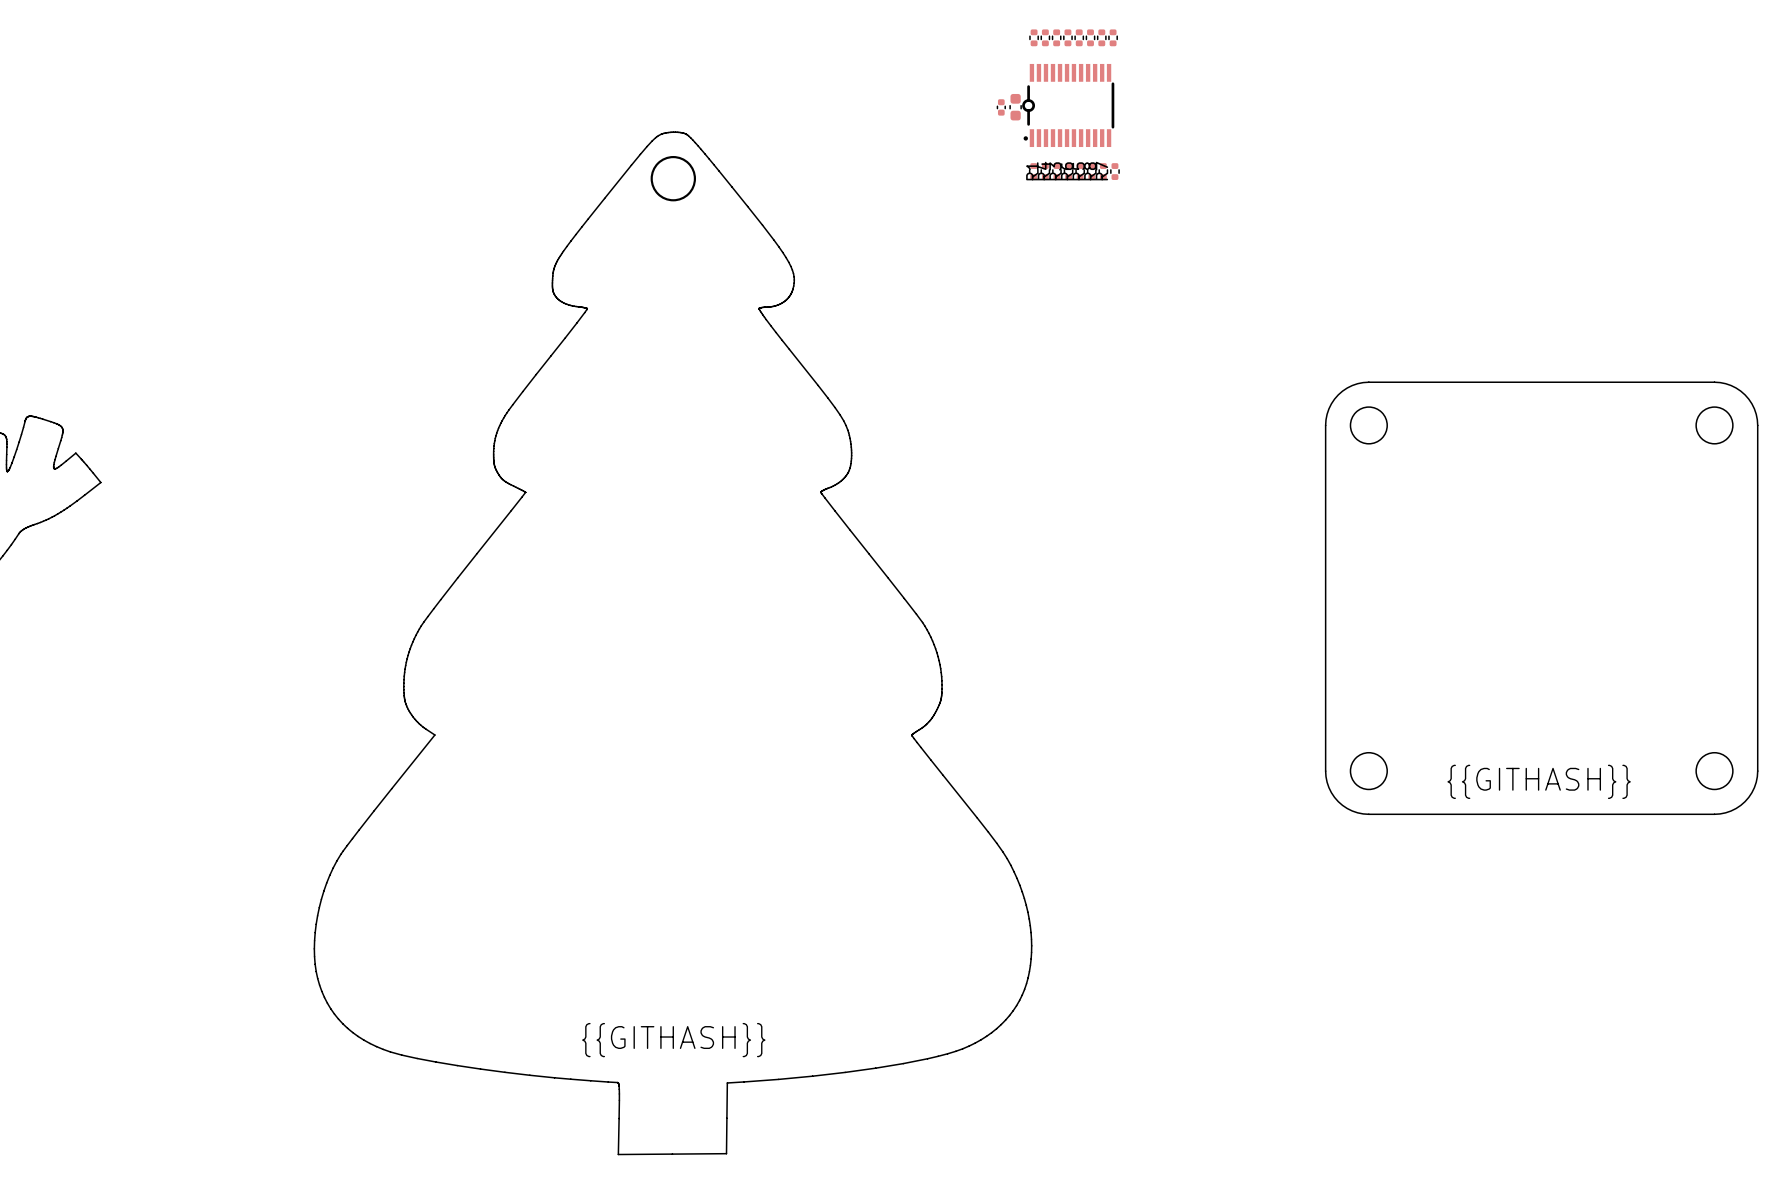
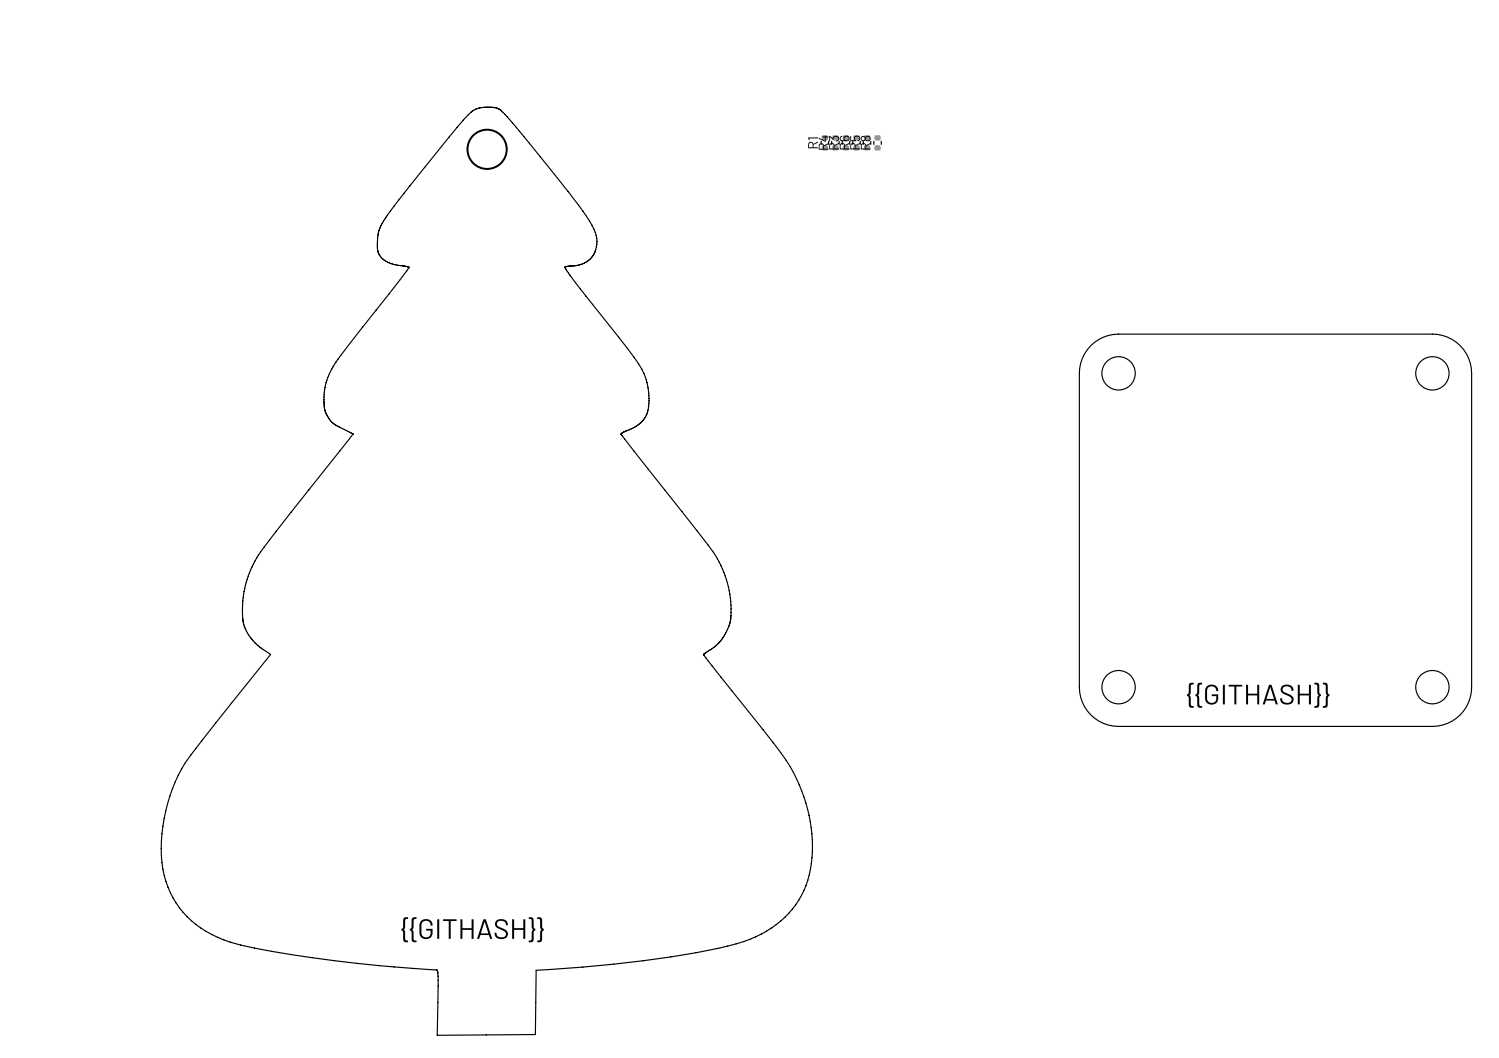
part: (1034, 37) -> none
part: (1045, 37) -> none
part: (1056, 37) -> none
part: (1067, 37) -> none
part: (1079, 37) -> none
part: (1090, 37) -> none
part: (1101, 37) -> none
part: (1113, 37) -> none
part: (1068, 105) -> none
part: (1001, 107) -> none
part: (1015, 107) -> none
part: (1033, 171) -> none
R7: (1114, 171) -> none

